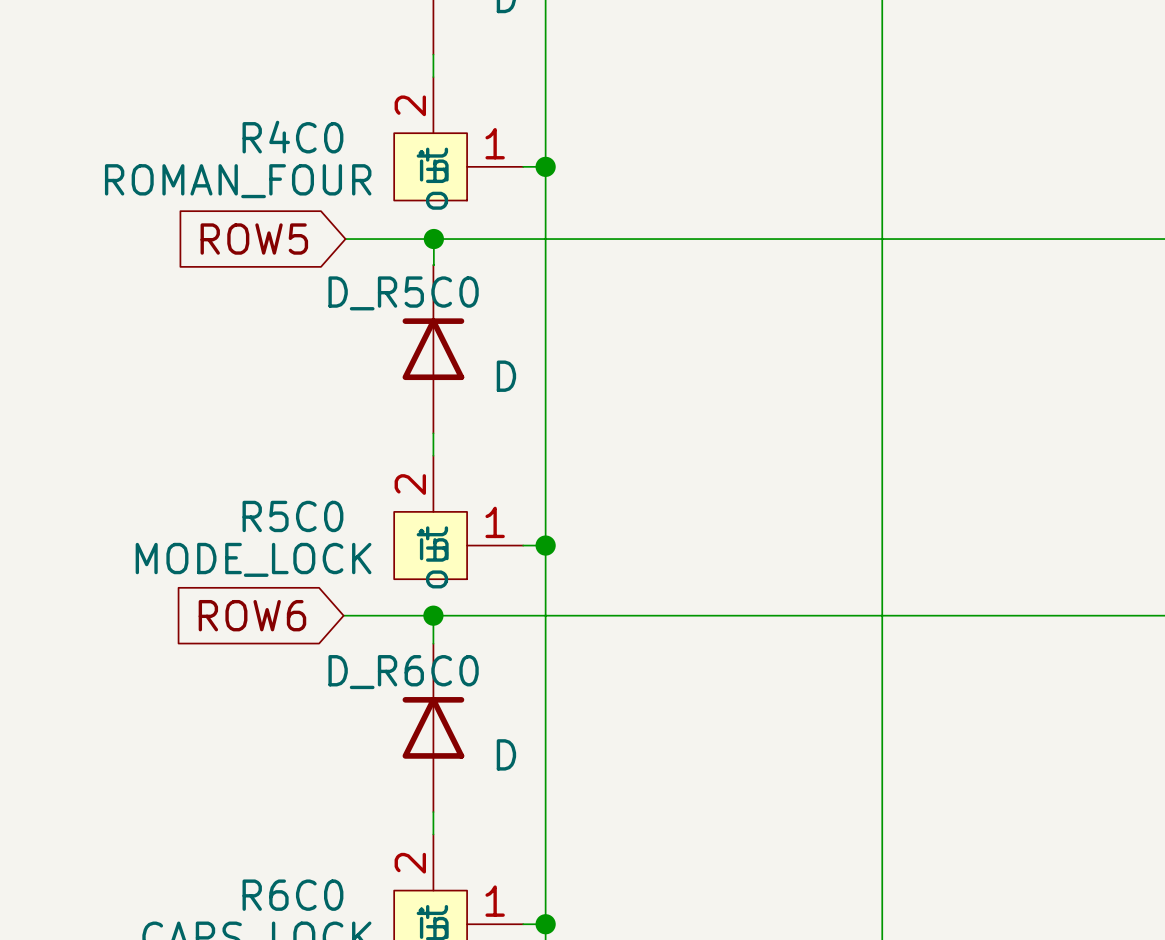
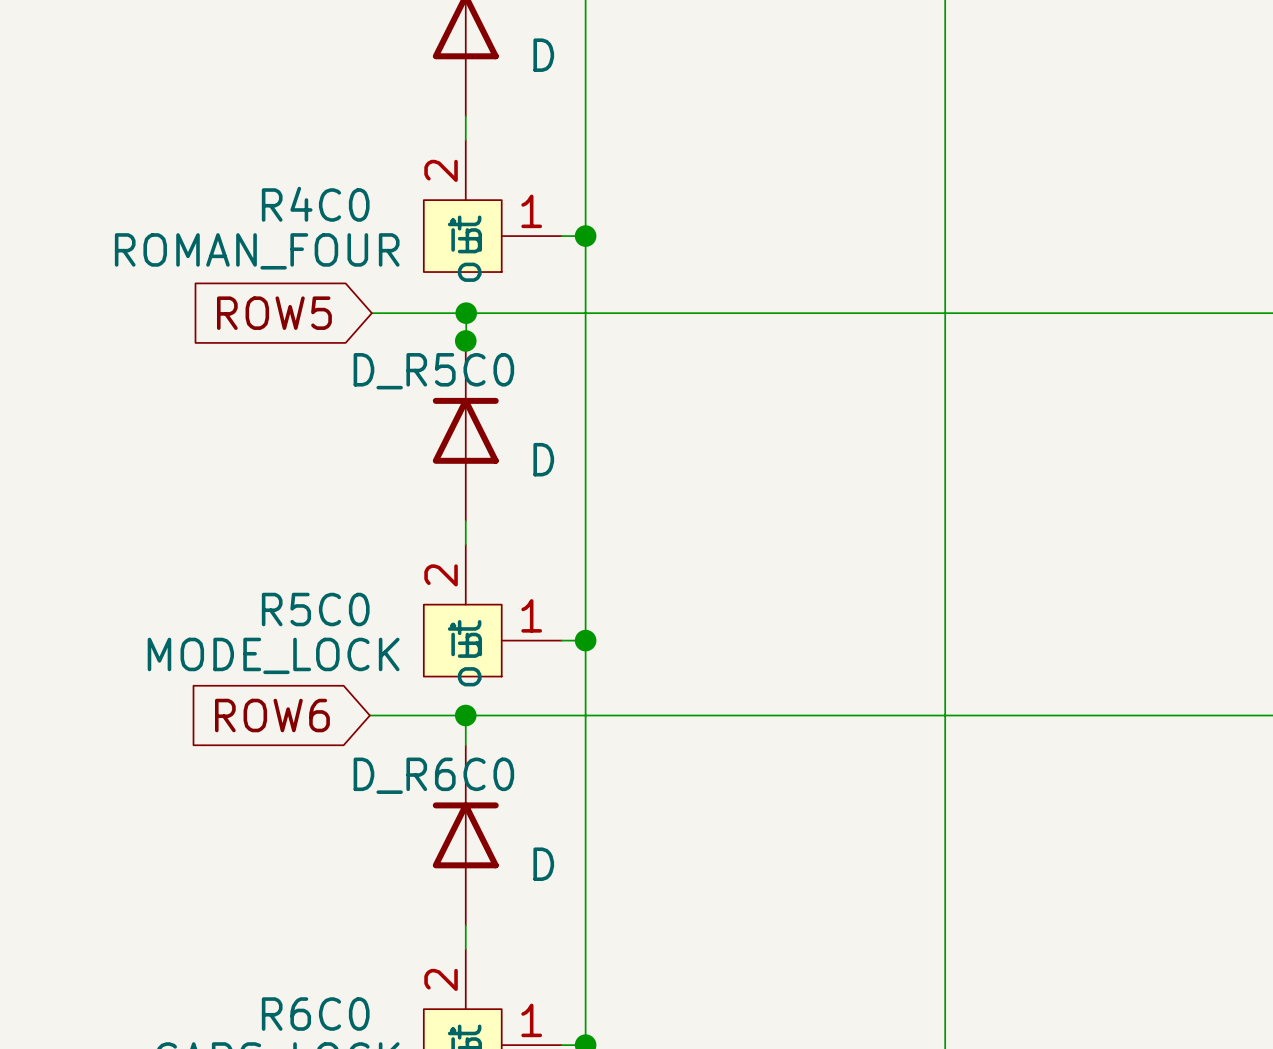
junction: none -> (465, 340)

